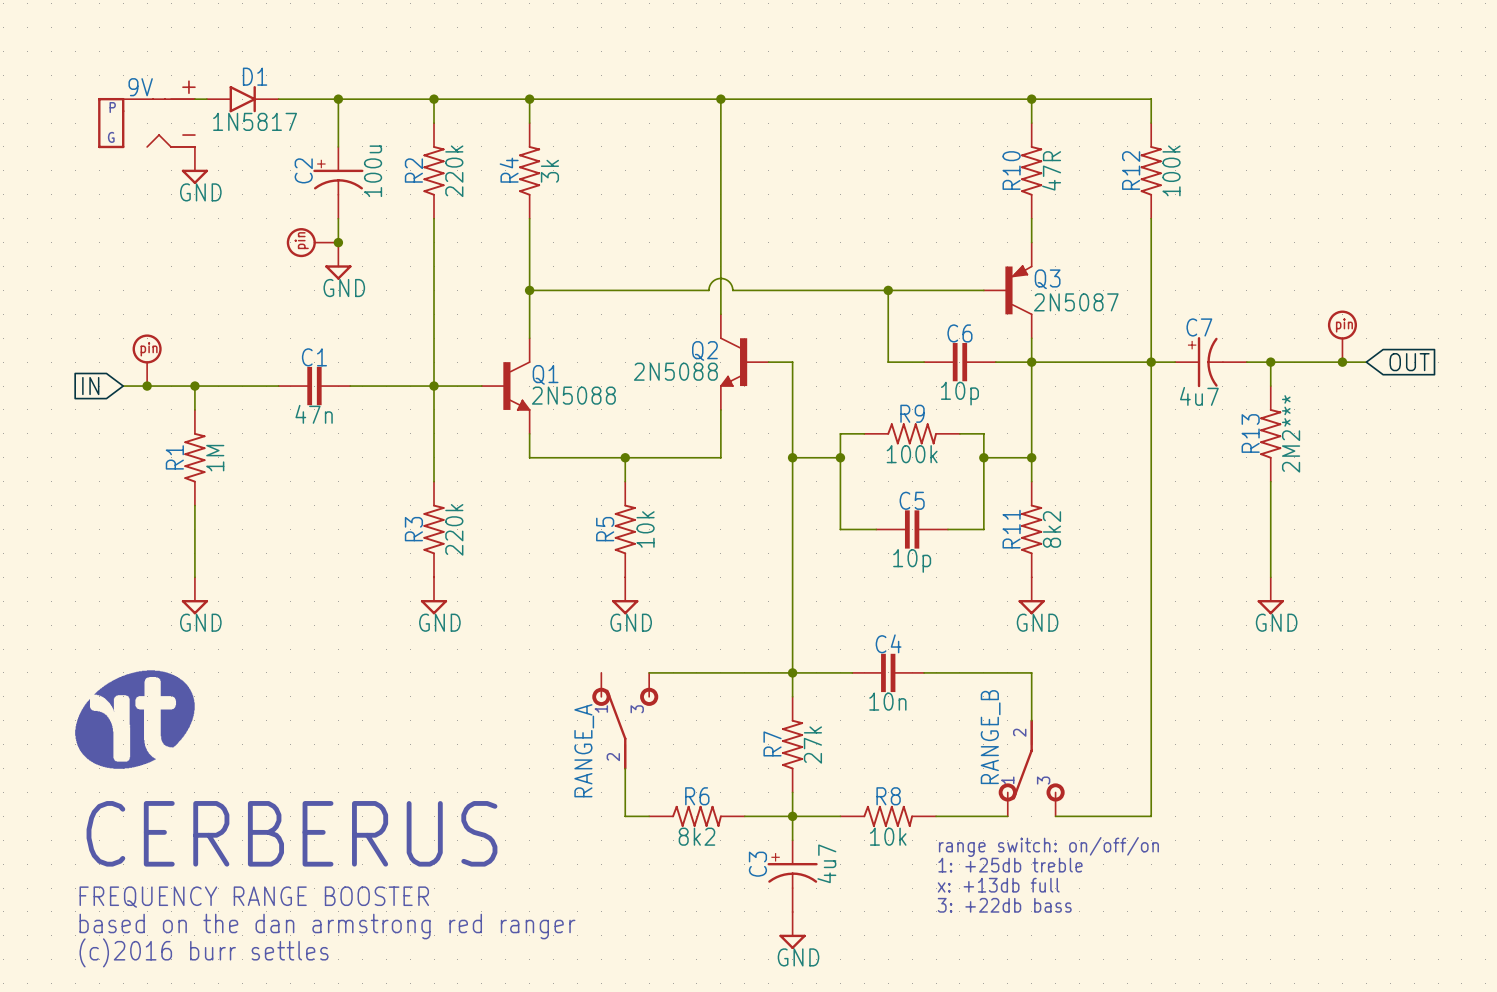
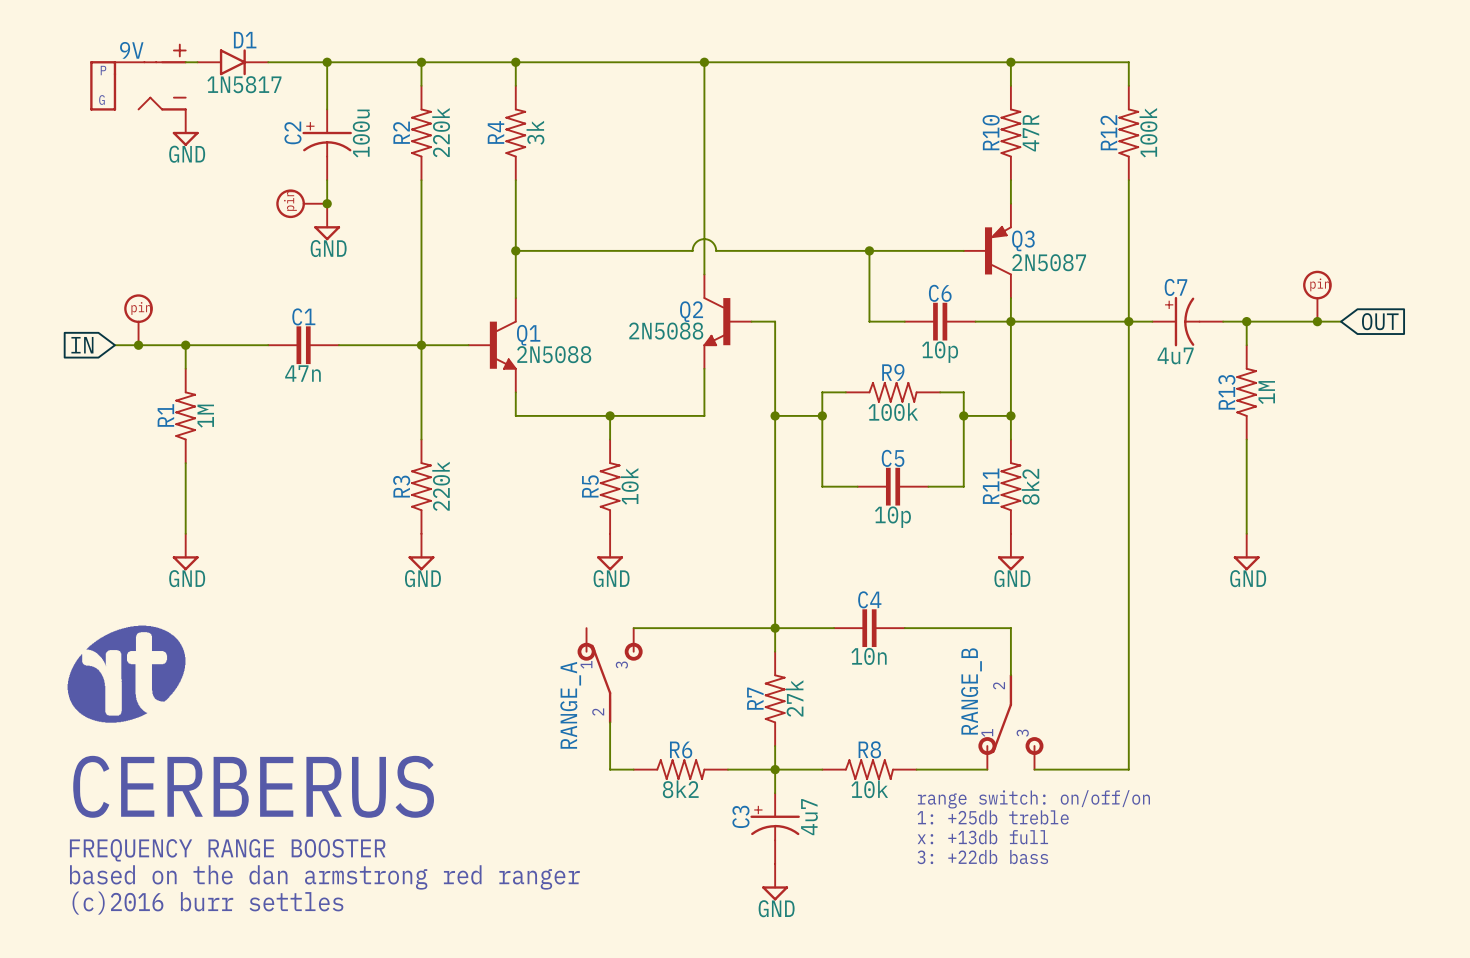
R13 value: 2M2*** (1291, 433) -> 1M (1266, 392)

